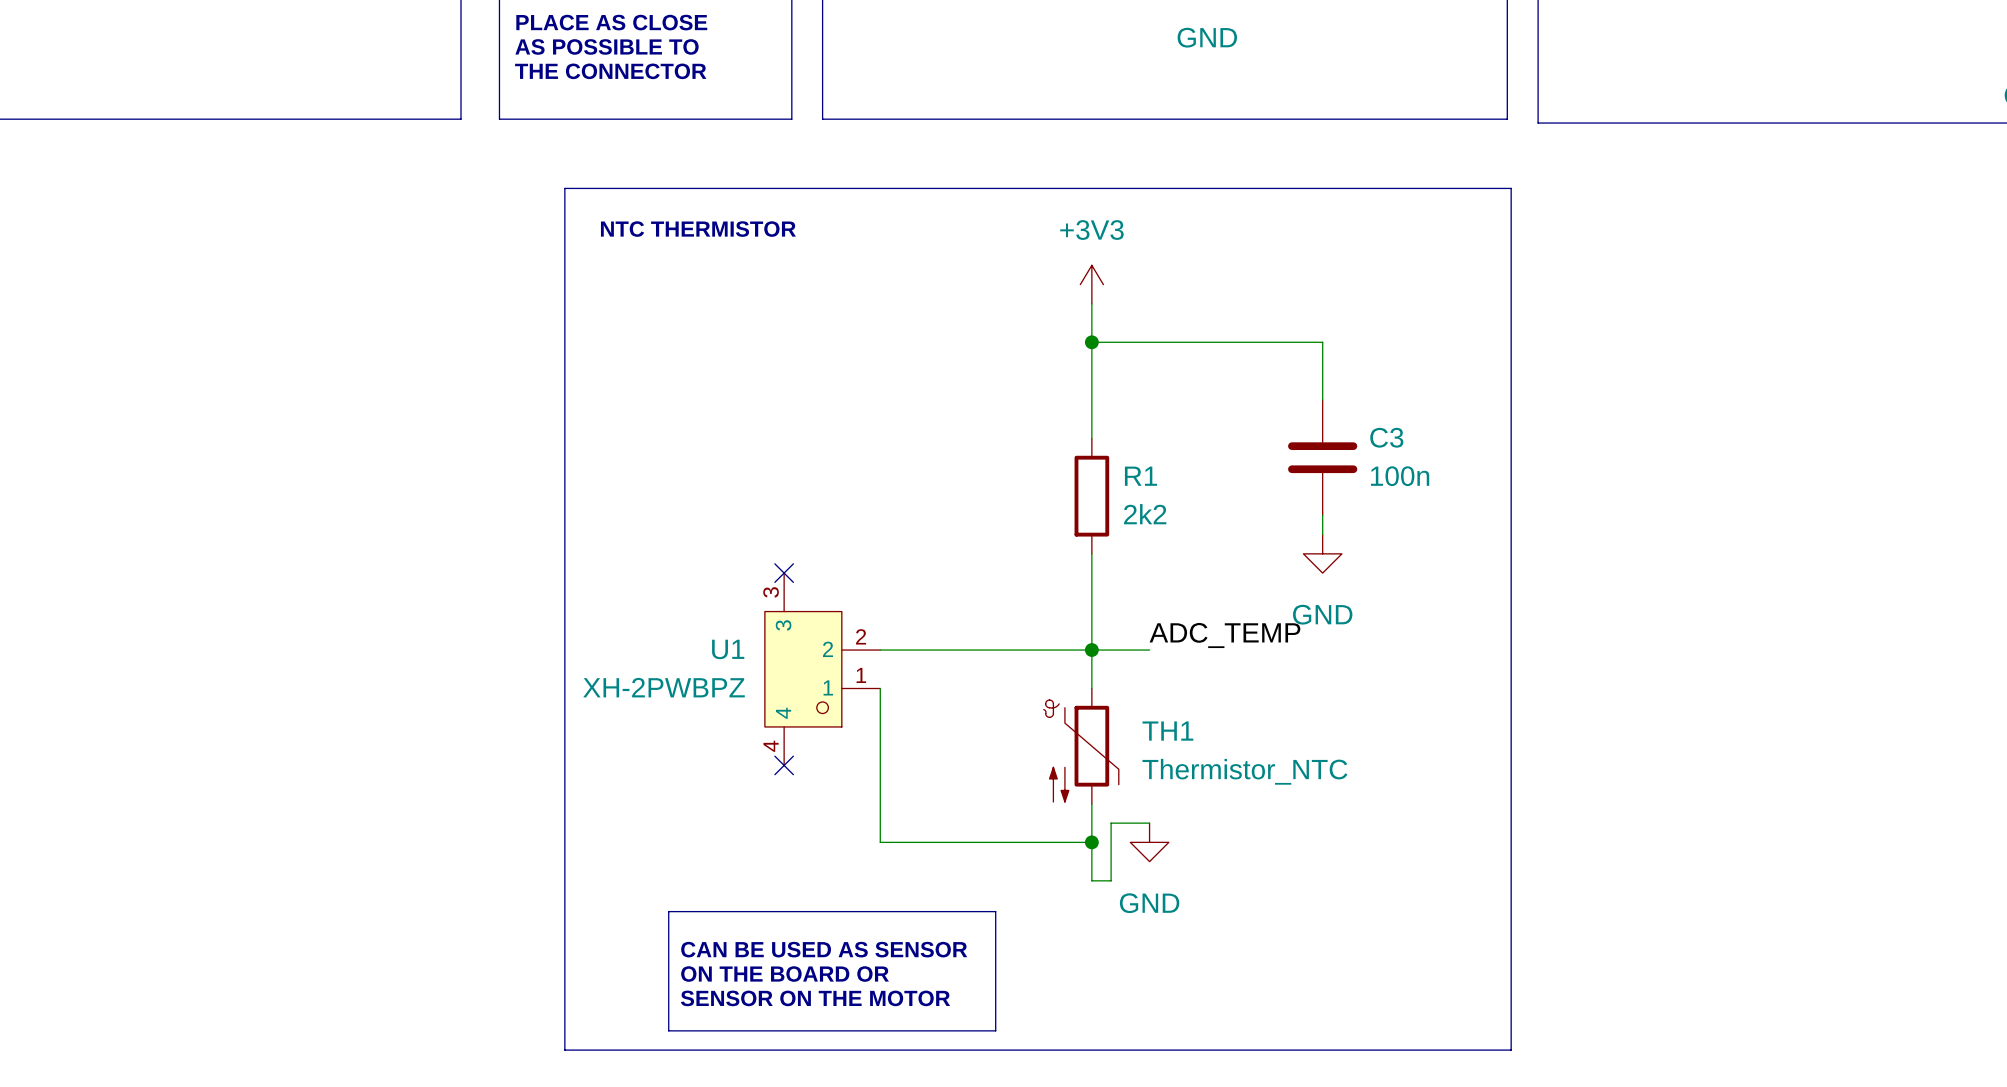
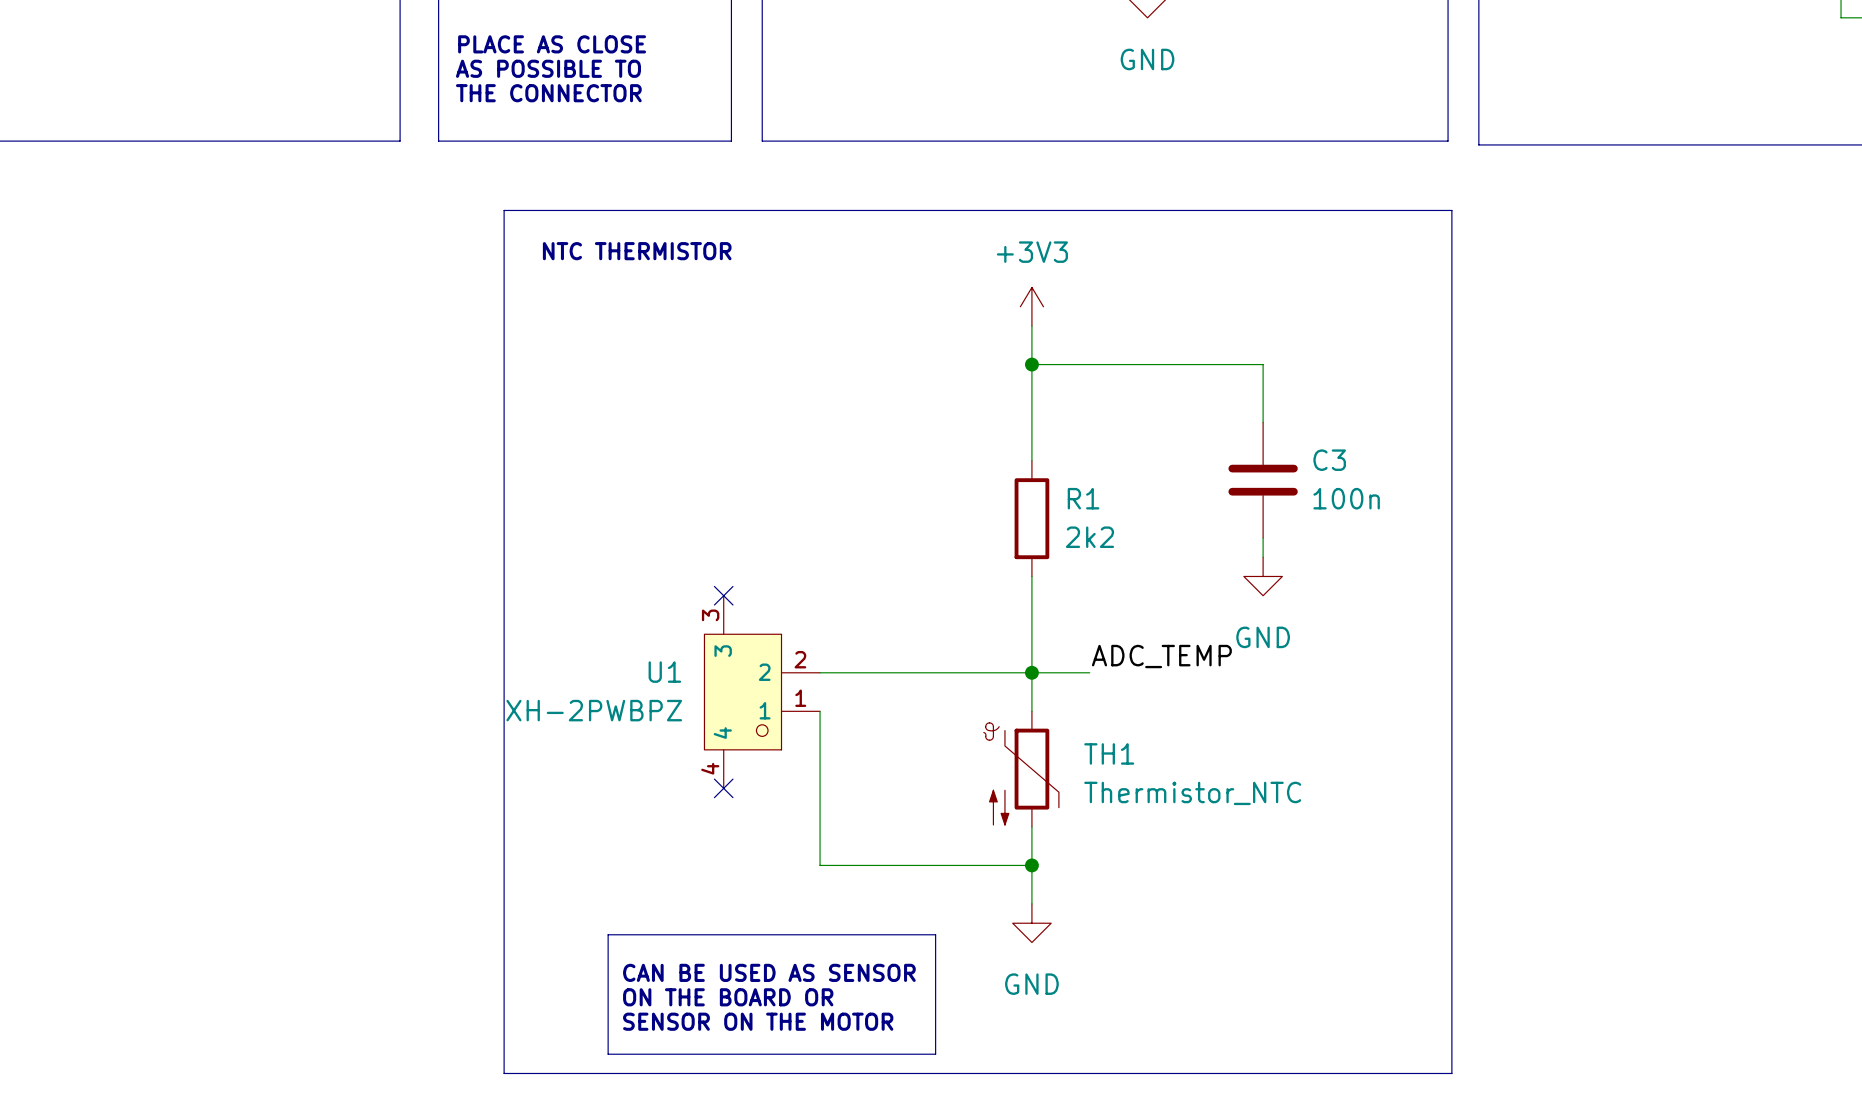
wire: (1149, 823) (1111, 823) (1111, 880) (1091, 880) -> none
power symbol position: GND (1149, 842) -> GND (1031, 923)

